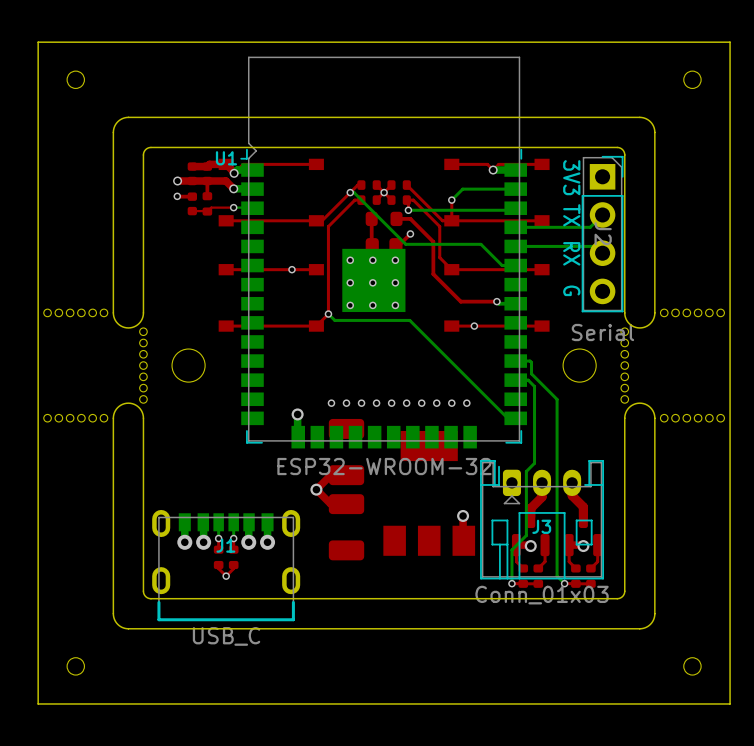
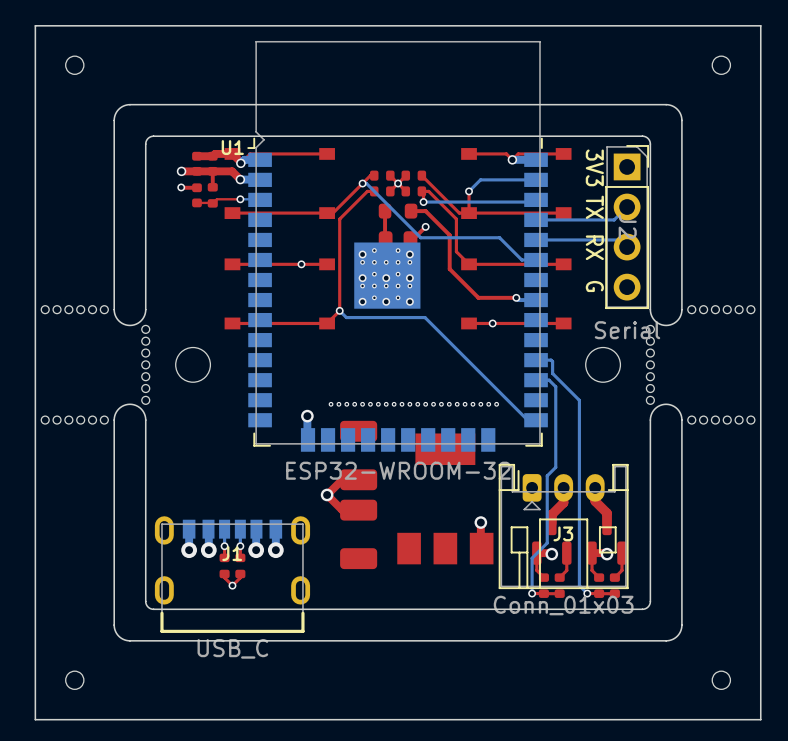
via: none -> (374, 250)
via: none -> (398, 250)
via: (372, 260) -> none
via: none -> (362, 262)
via: none -> (374, 262)
via: none -> (386, 262)
via: none -> (398, 262)
via: none -> (409, 262)
via: none -> (374, 274)
via: none -> (398, 274)
via: none -> (362, 286)
via: none -> (374, 286)
via: none -> (386, 286)
via: none -> (398, 286)
via: none -> (409, 286)
via: none -> (374, 297)
via: none -> (398, 297)
via: none -> (331, 404)
via: none -> (338, 404)
via: (331, 403) -> none
via: none -> (346, 404)
via: none -> (354, 404)
via: (346, 403) -> none
via: none -> (362, 404)
via: none -> (370, 404)
via: (361, 403) -> none
via: none -> (378, 404)
via: none -> (386, 404)
via: (376, 403) -> none
via: none -> (394, 404)
via: none -> (402, 404)
via: (391, 403) -> none
via: none -> (409, 404)
via: none -> (417, 404)
via: (406, 403) -> none
via: none -> (425, 404)
via: none -> (433, 404)
via: (421, 403) -> none
via: none -> (441, 404)
via: none -> (449, 404)
via: (436, 403) -> none
via: none -> (457, 404)
via: none -> (465, 404)
via: (451, 403) -> none
via: none -> (472, 404)
via: none -> (480, 404)
via: (466, 403) -> none
via: none -> (488, 404)
via: none -> (496, 404)

